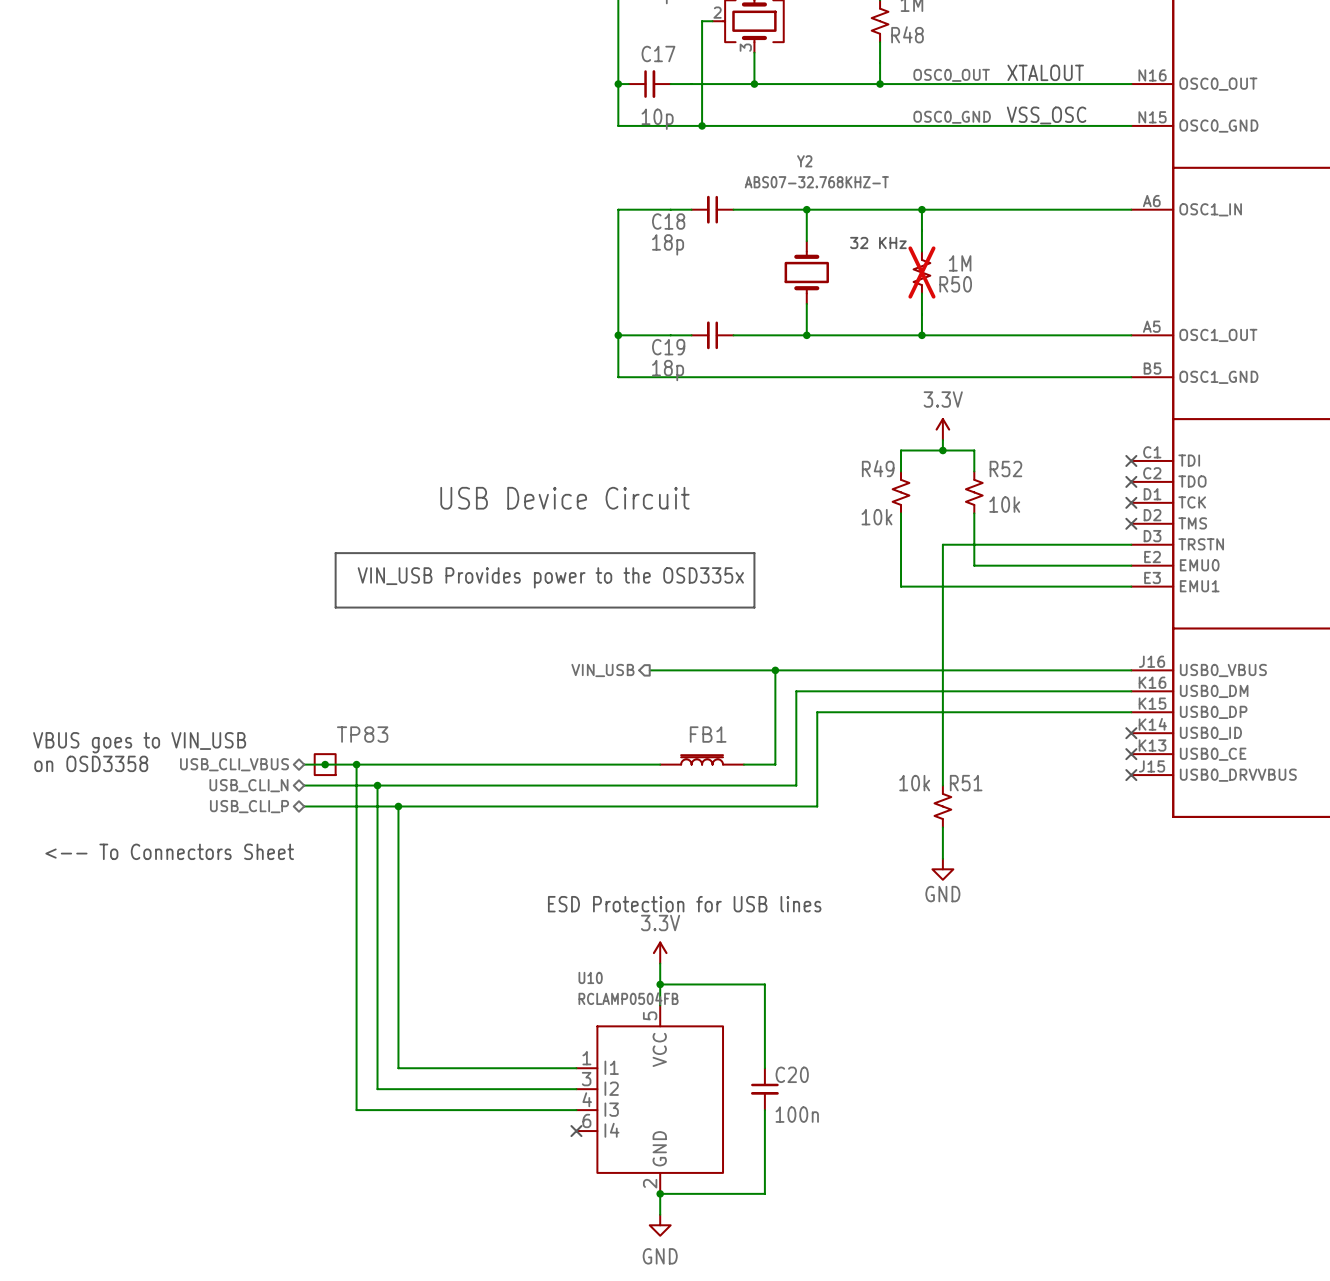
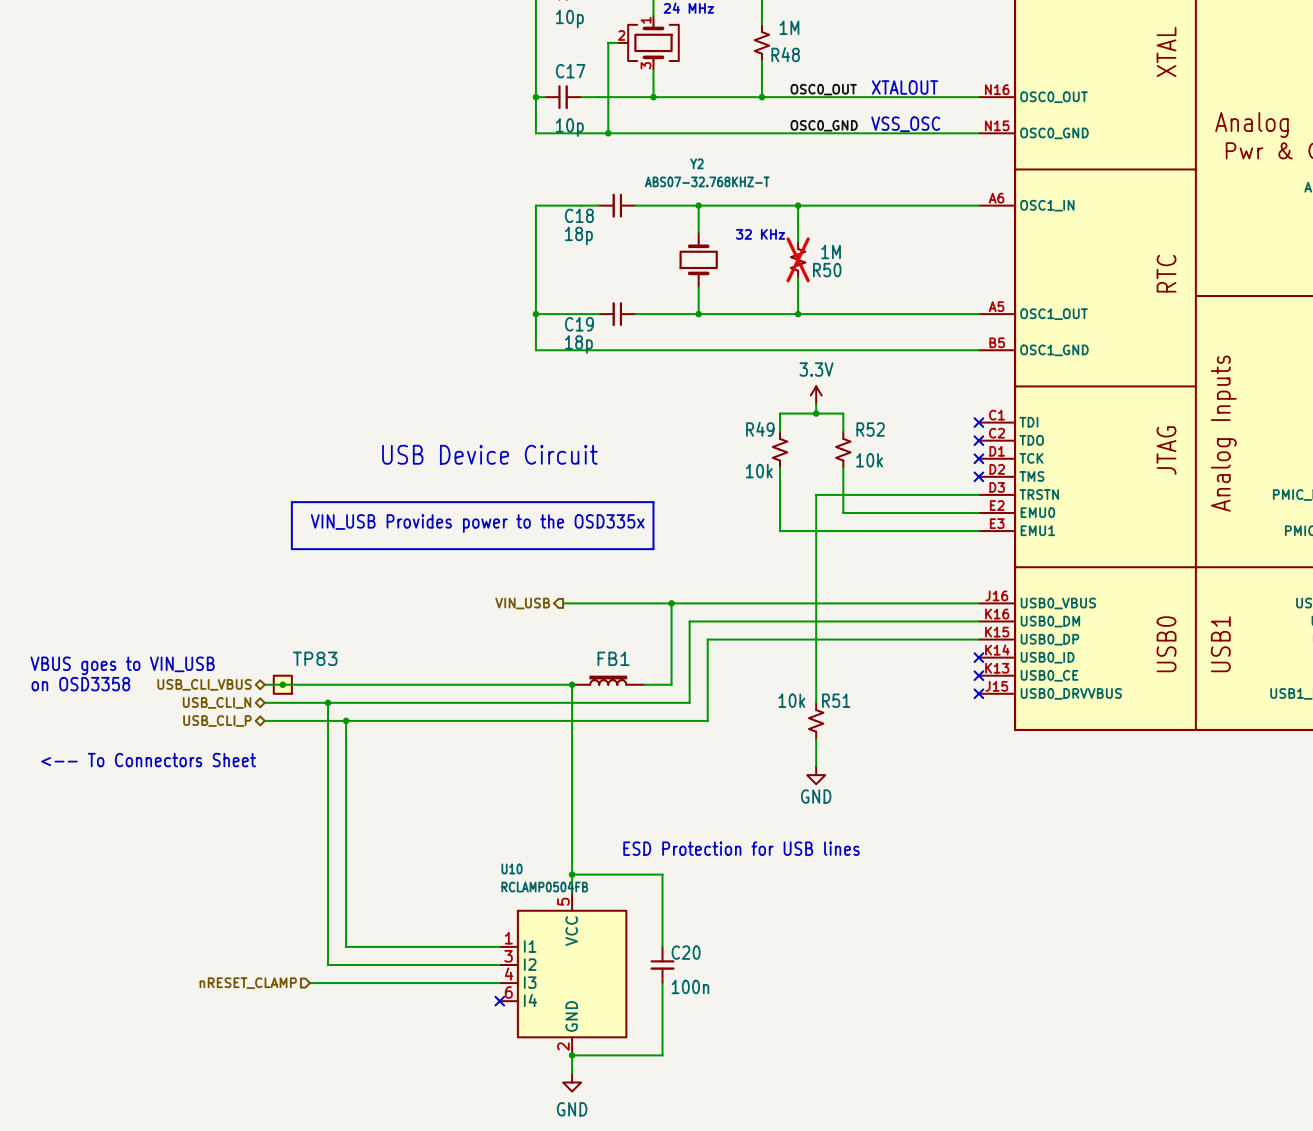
wire: (356, 764) (356, 1110) -> none
junction: (356, 764) -> none
wire: none -> (572, 684) (572, 856)
junction: none -> (572, 684)
text position: ESD Protection for USB lines (684, 904) -> ESD Protection for USB lines (741, 848)
power symbol: 3.3V (660, 952) -> none
hierarchical label: none -> nRESET_CLAMP (248, 983)

